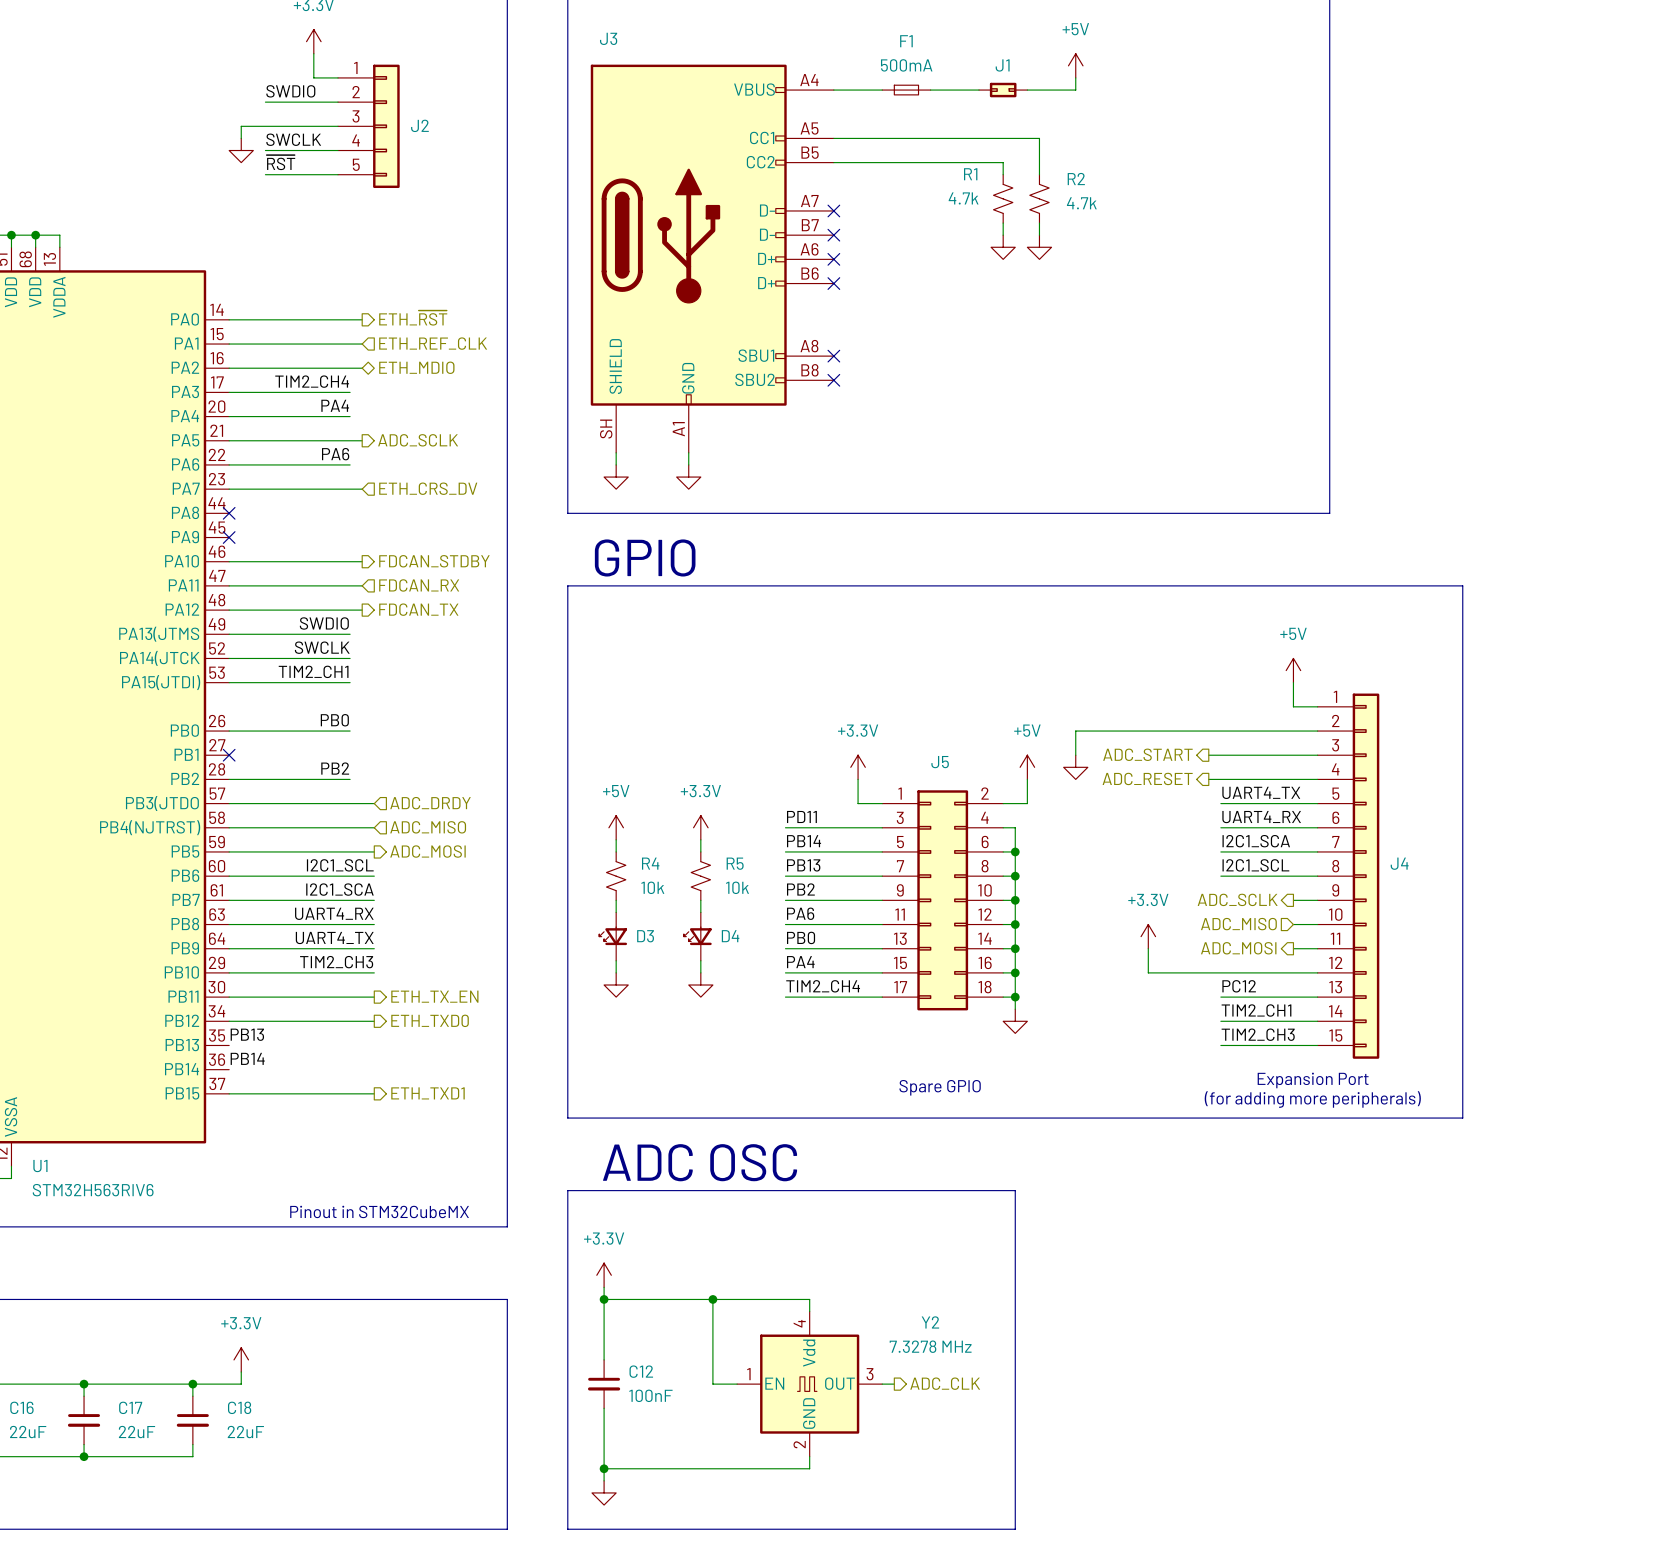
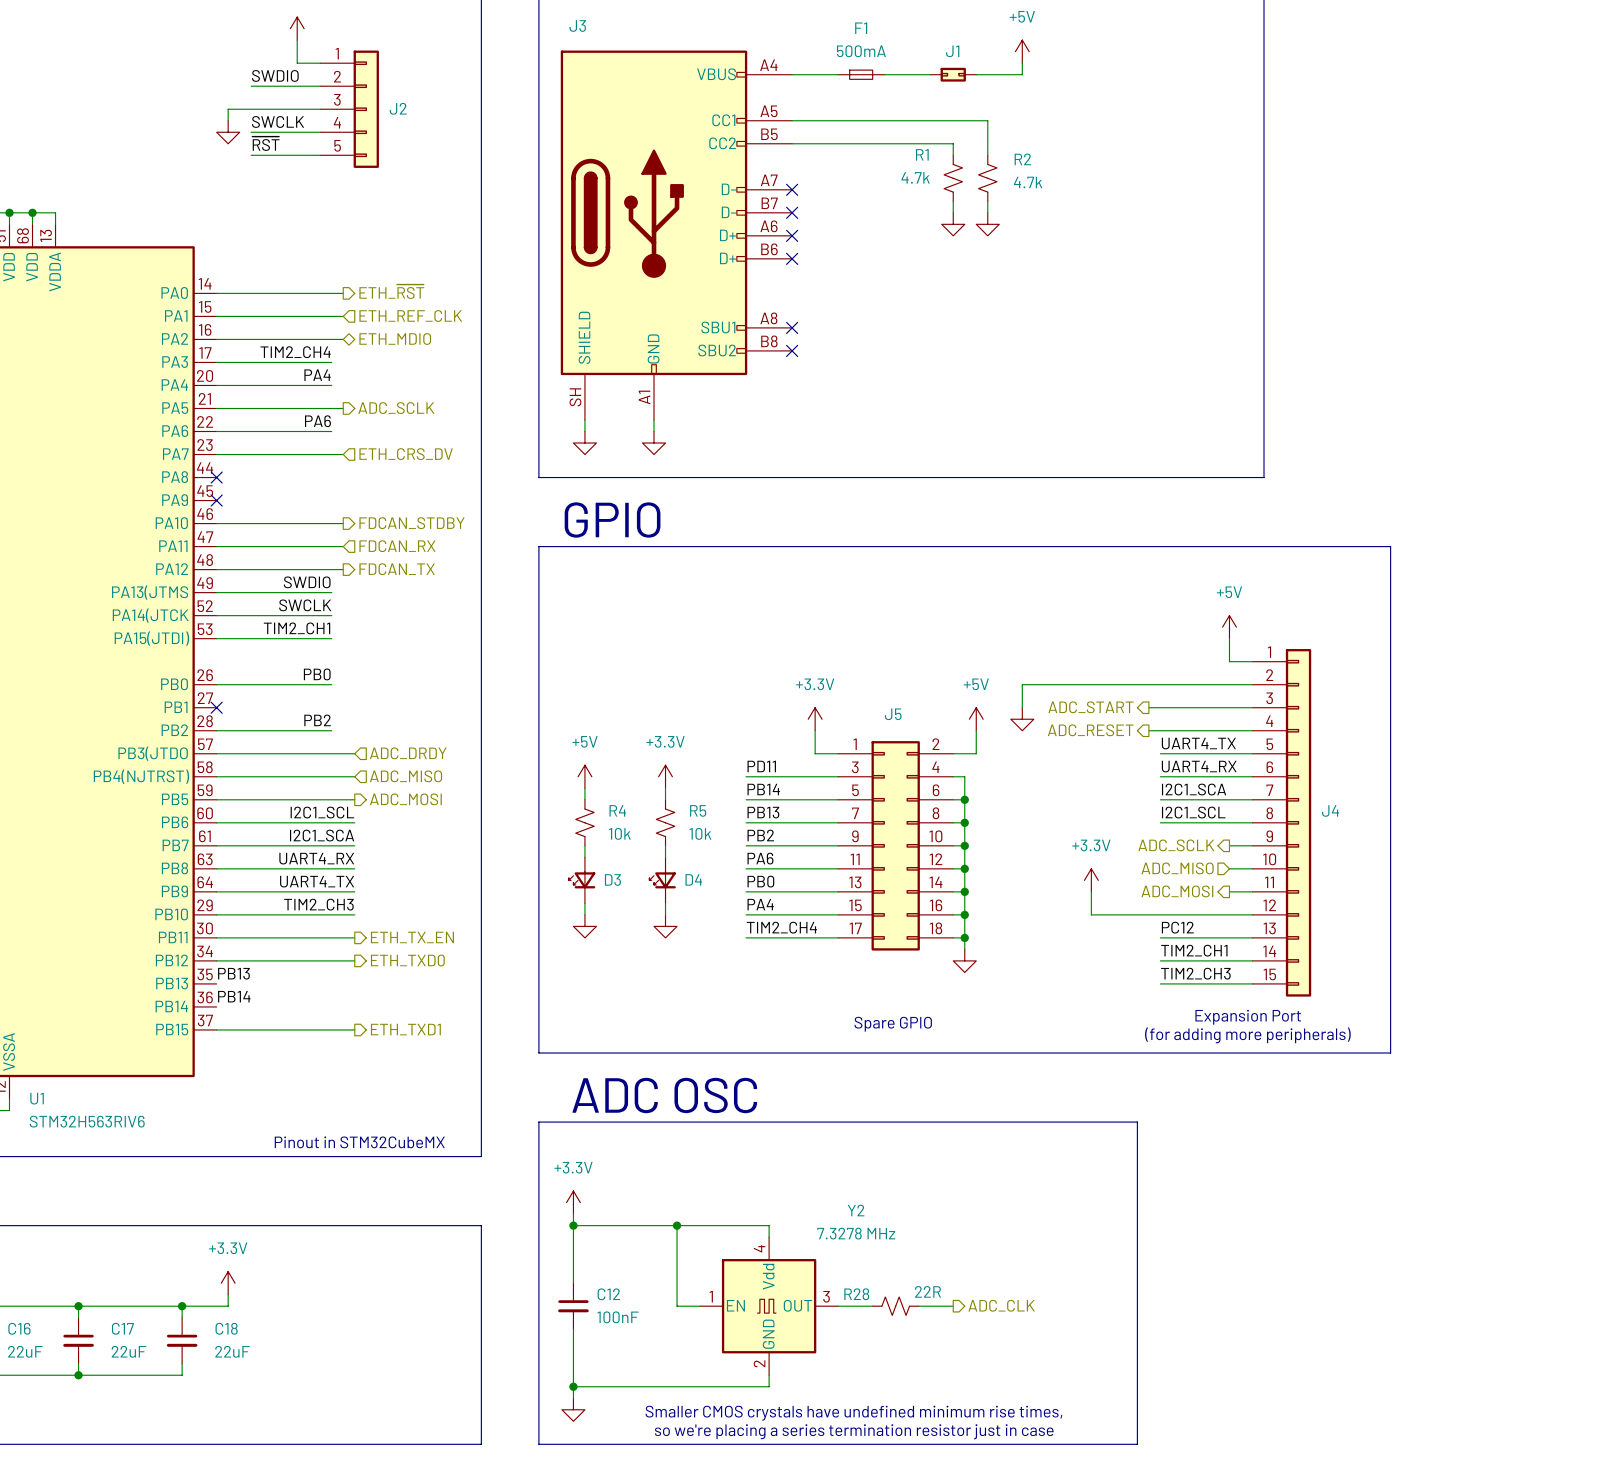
line: (1015, 1190) (1015, 1529) -> (964, 1122) (1137, 1122) (1137, 1444) (964, 1444)
Y2 name position: Y2 (930, 1322) -> Y2 (856, 1210)
Y2 value position: 7.3278 MHz (930, 1346) -> 7.3278 MHz (856, 1233)
hierarchical label position: ADC_CLK (945, 1383) -> ADC_CLK (1001, 1305)
wire: none -> (849, 1306) (872, 1306)
R28: none -> 22R (895, 1306)
wire: none -> (918, 1306) (953, 1306)
text: none -> Smaller CMOS crystals have undefined minimum rise times, (853, 1413)
text: none -> so we're placing a series termination resistor just in case (854, 1431)

